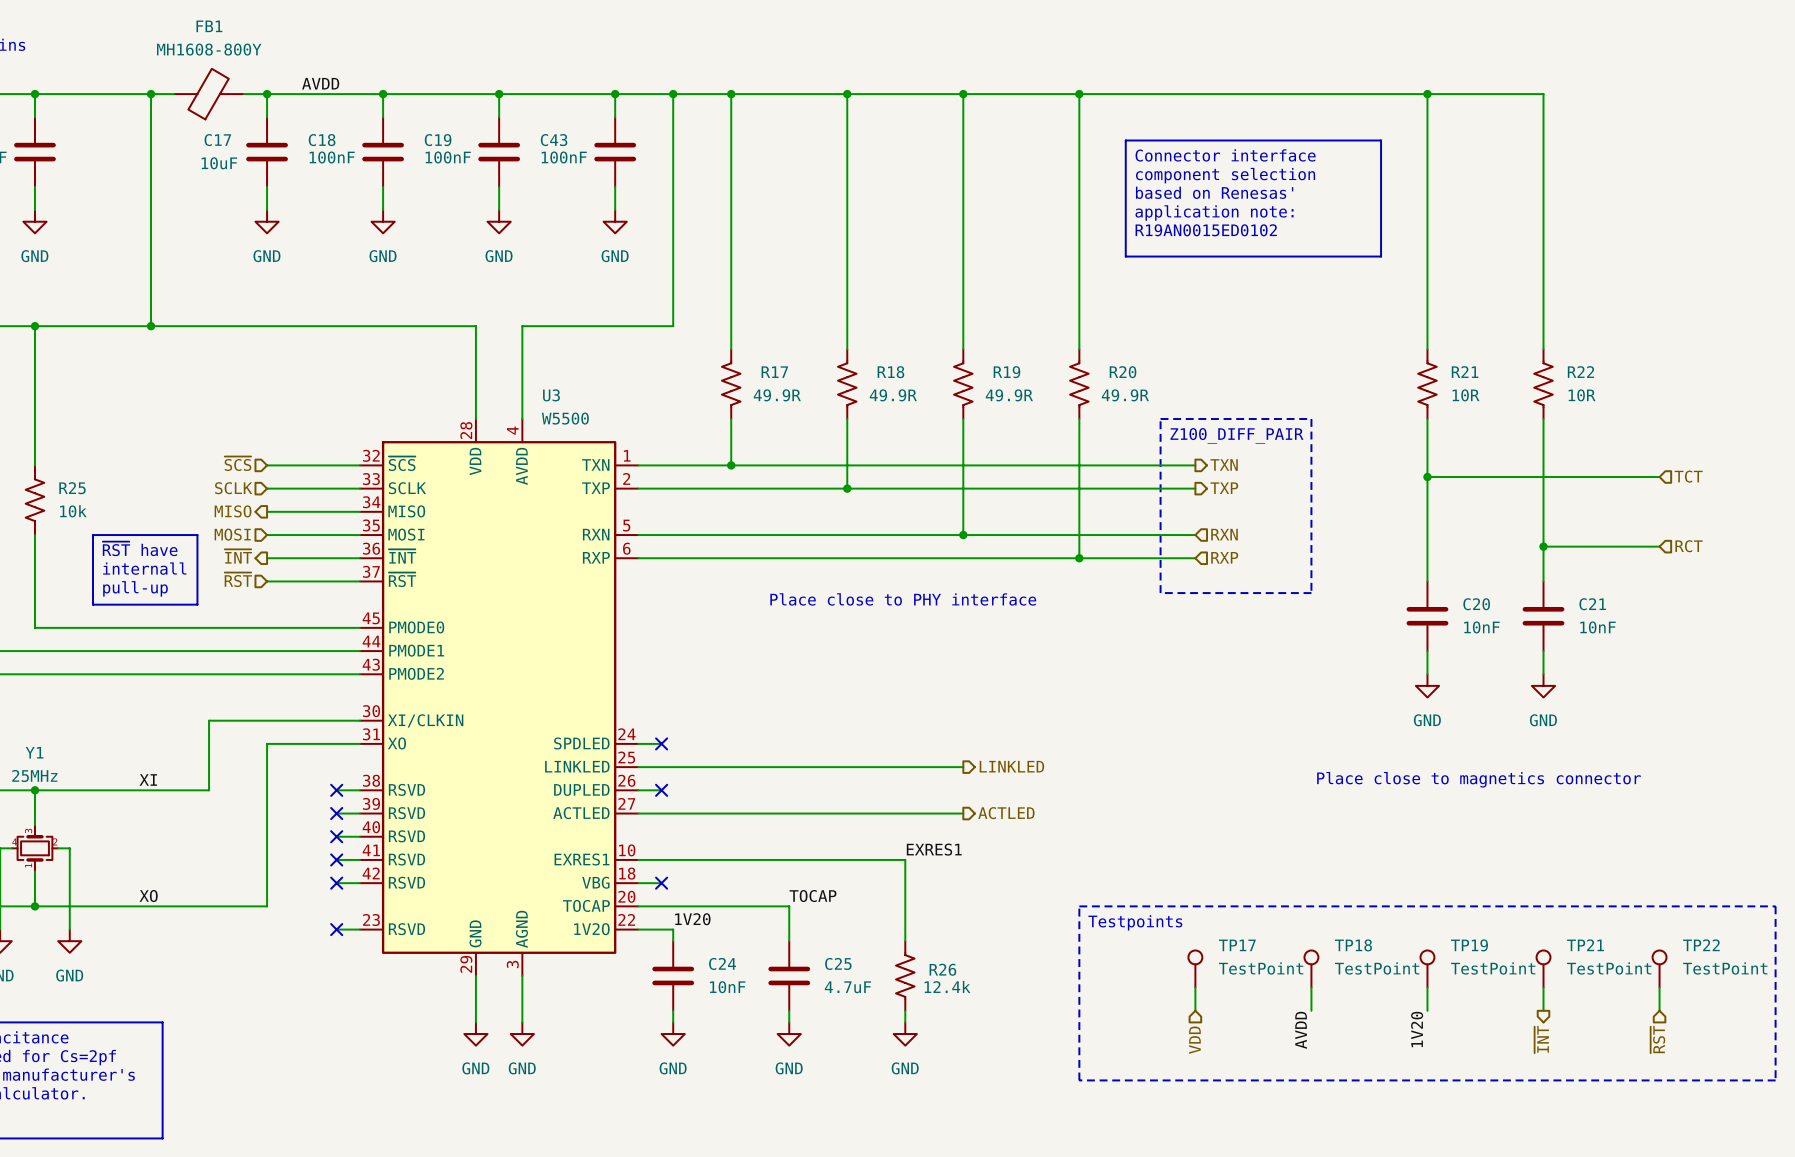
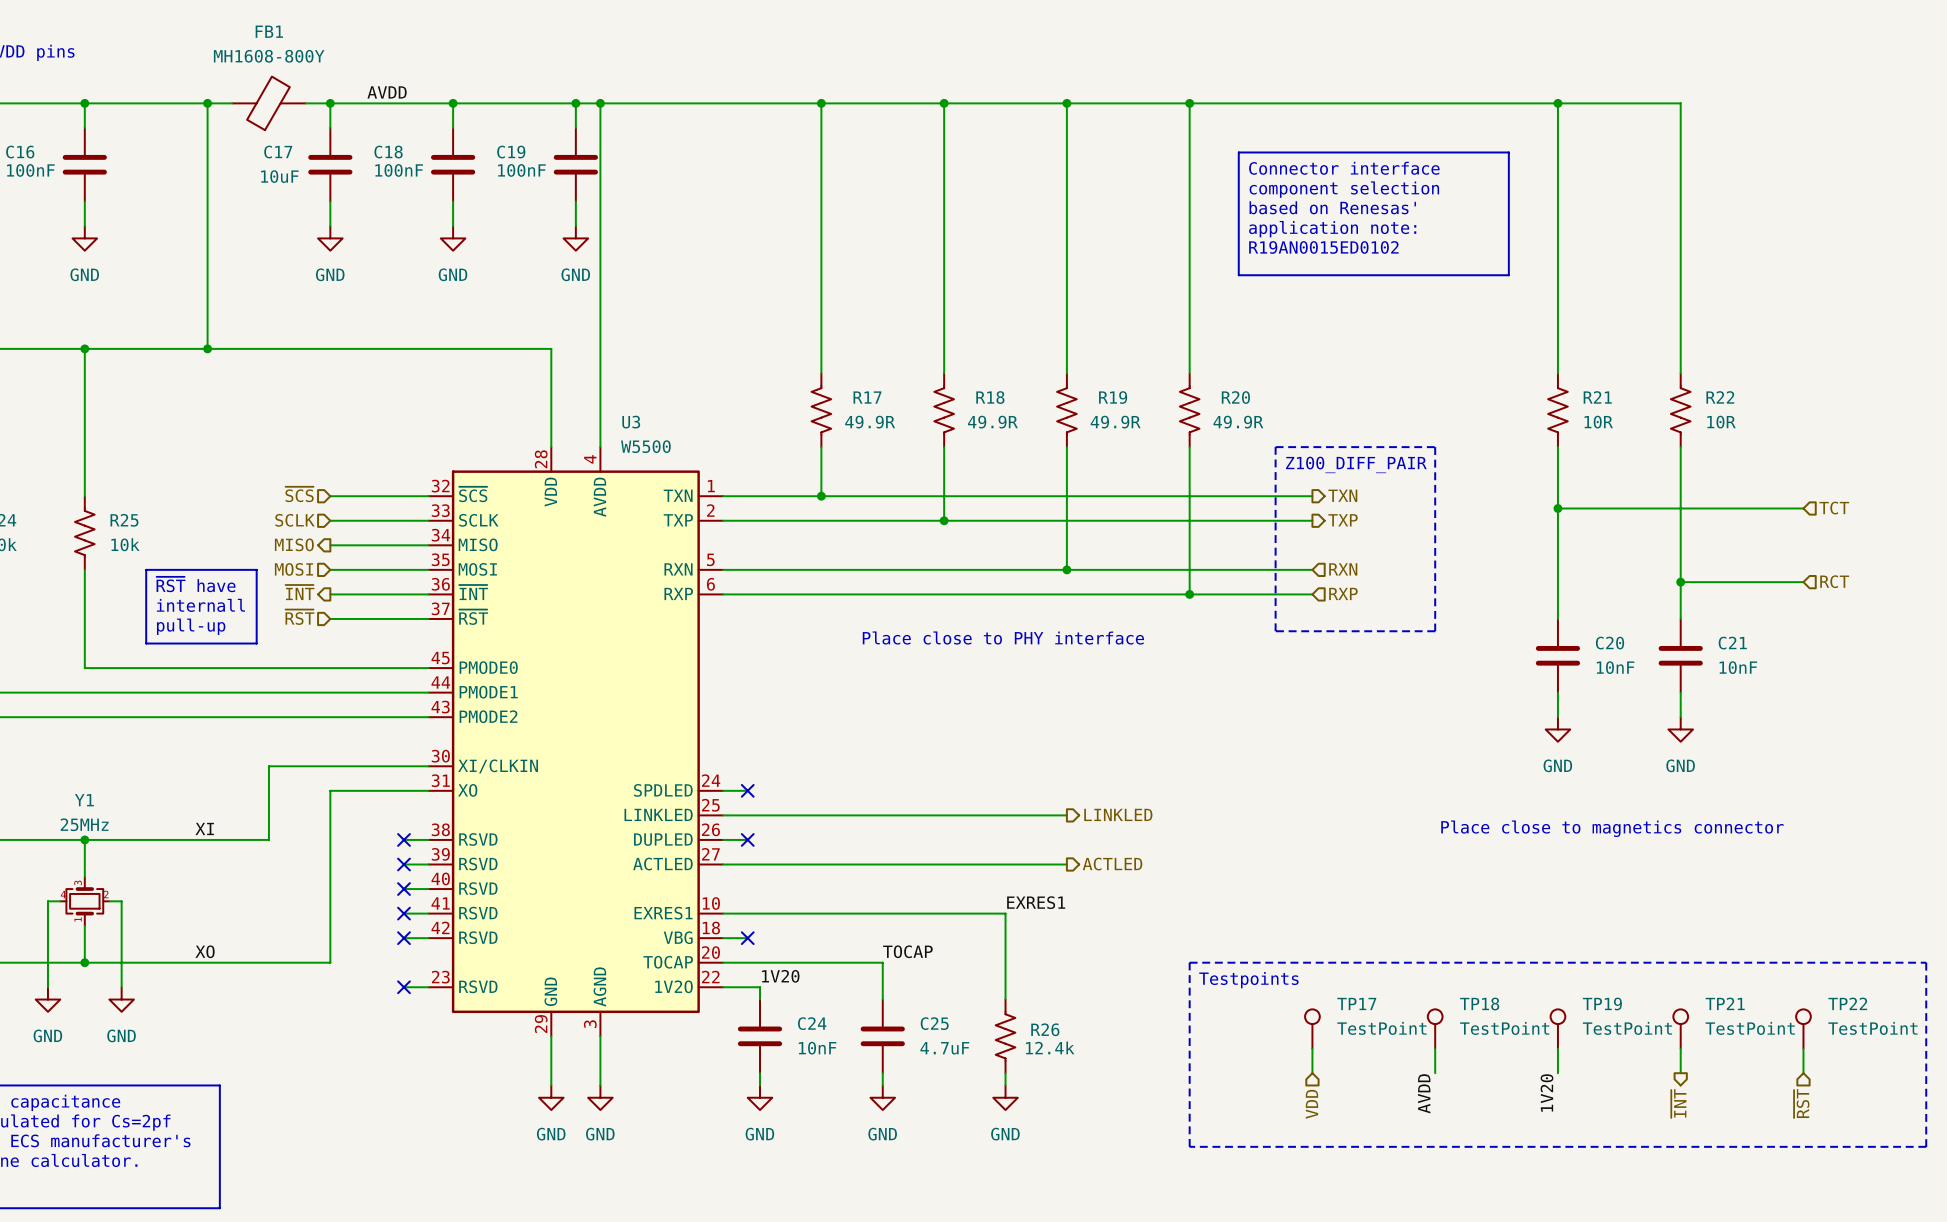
junction: none -> (600, 103)
wire: (615, 94) (615, 117) -> none
junction: (615, 94) -> none
wire: (673, 94) (673, 326) (522, 326) -> (600, 103) (600, 348)
junction: (673, 94) -> none
C43: 100nF (615, 152) -> none
wire: (615, 186) (615, 210) -> none
power symbol: GND (615, 221) -> none

